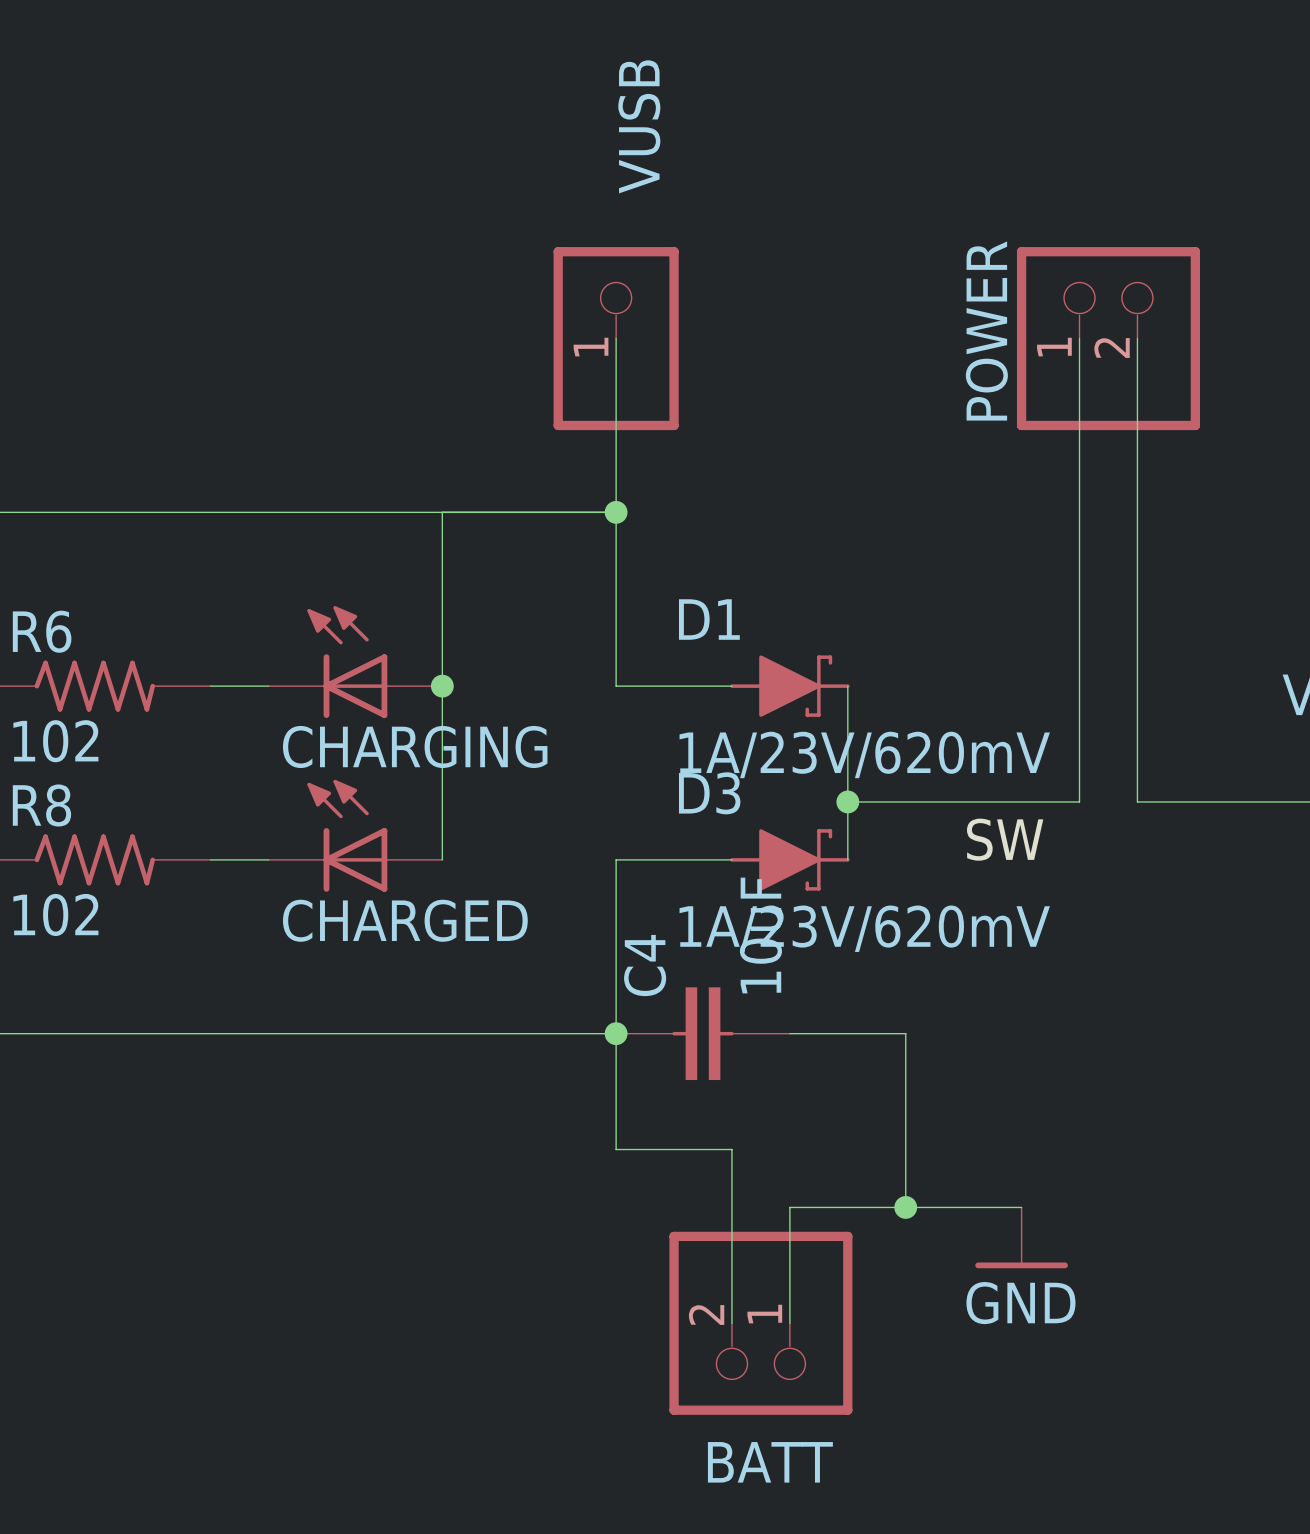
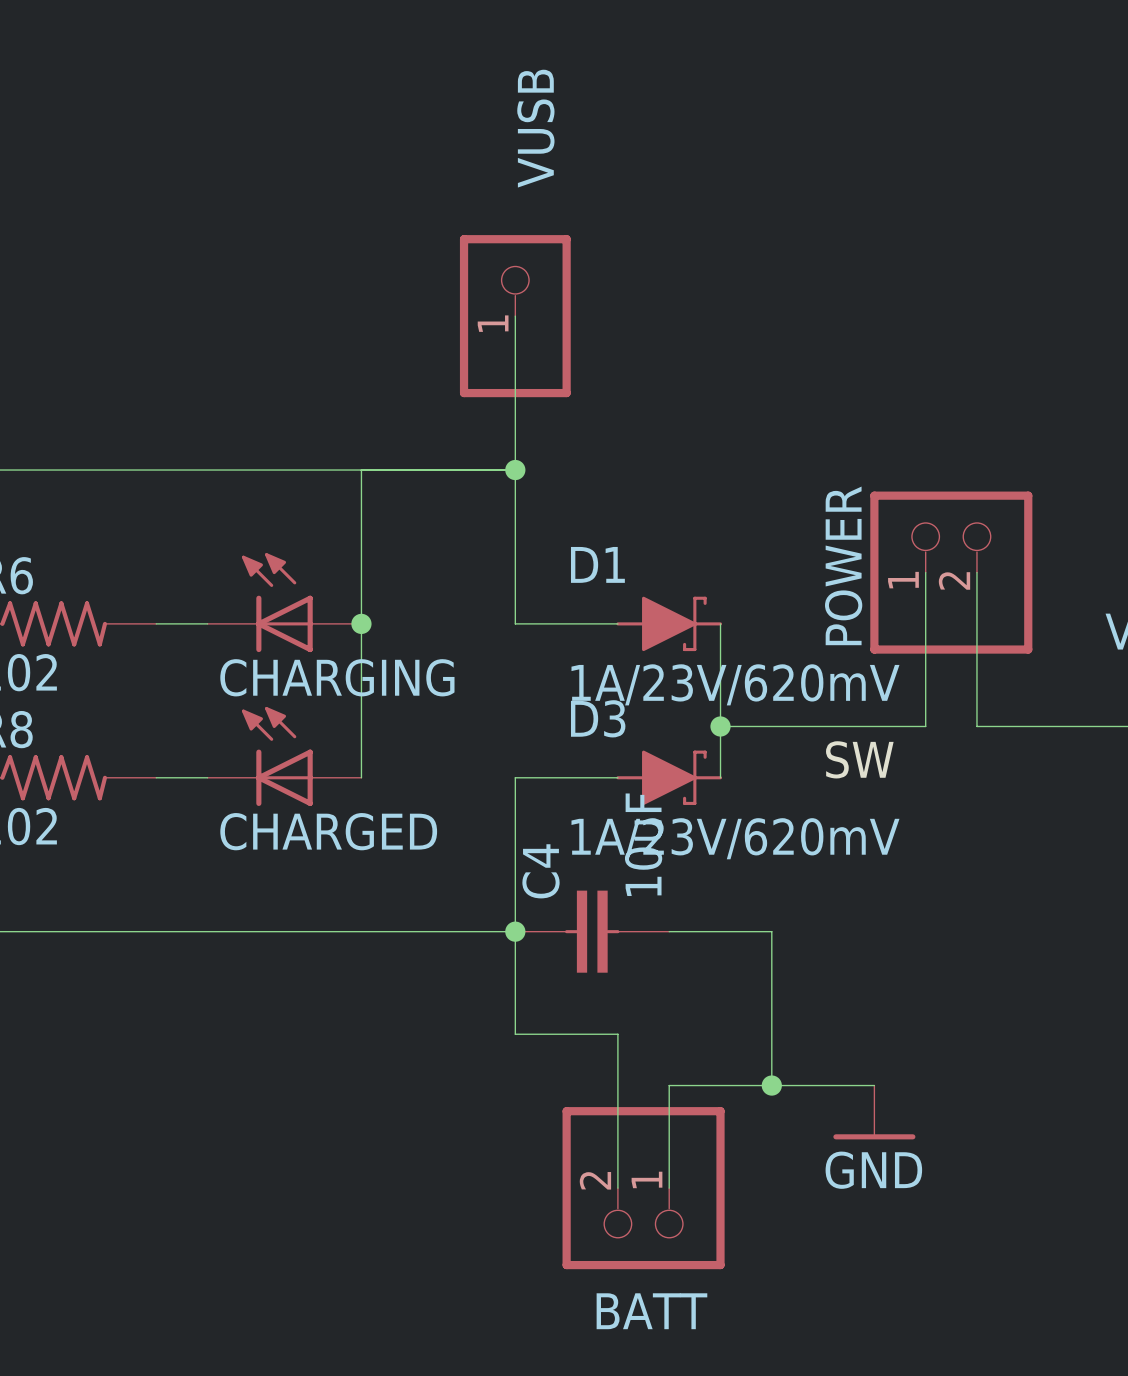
wire: (1079, 338) (1079, 628) -> none
POWER position: (1108, 338) -> (951, 572)
wire: (1137, 338) (1137, 628) -> none

